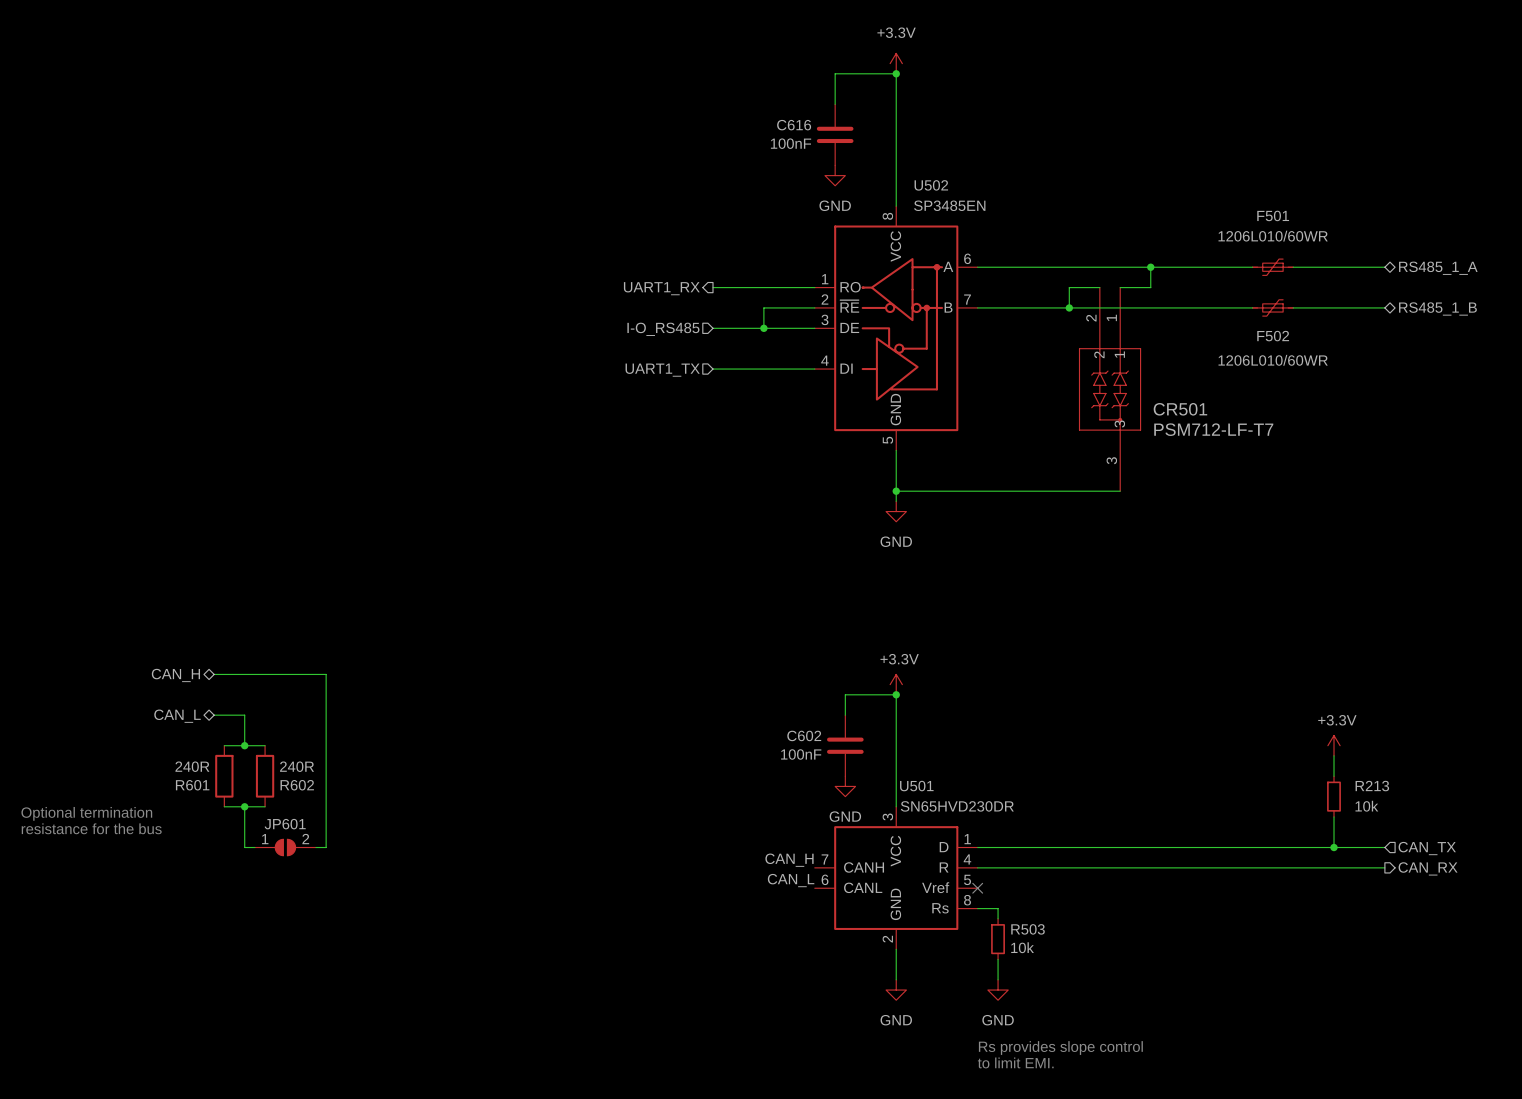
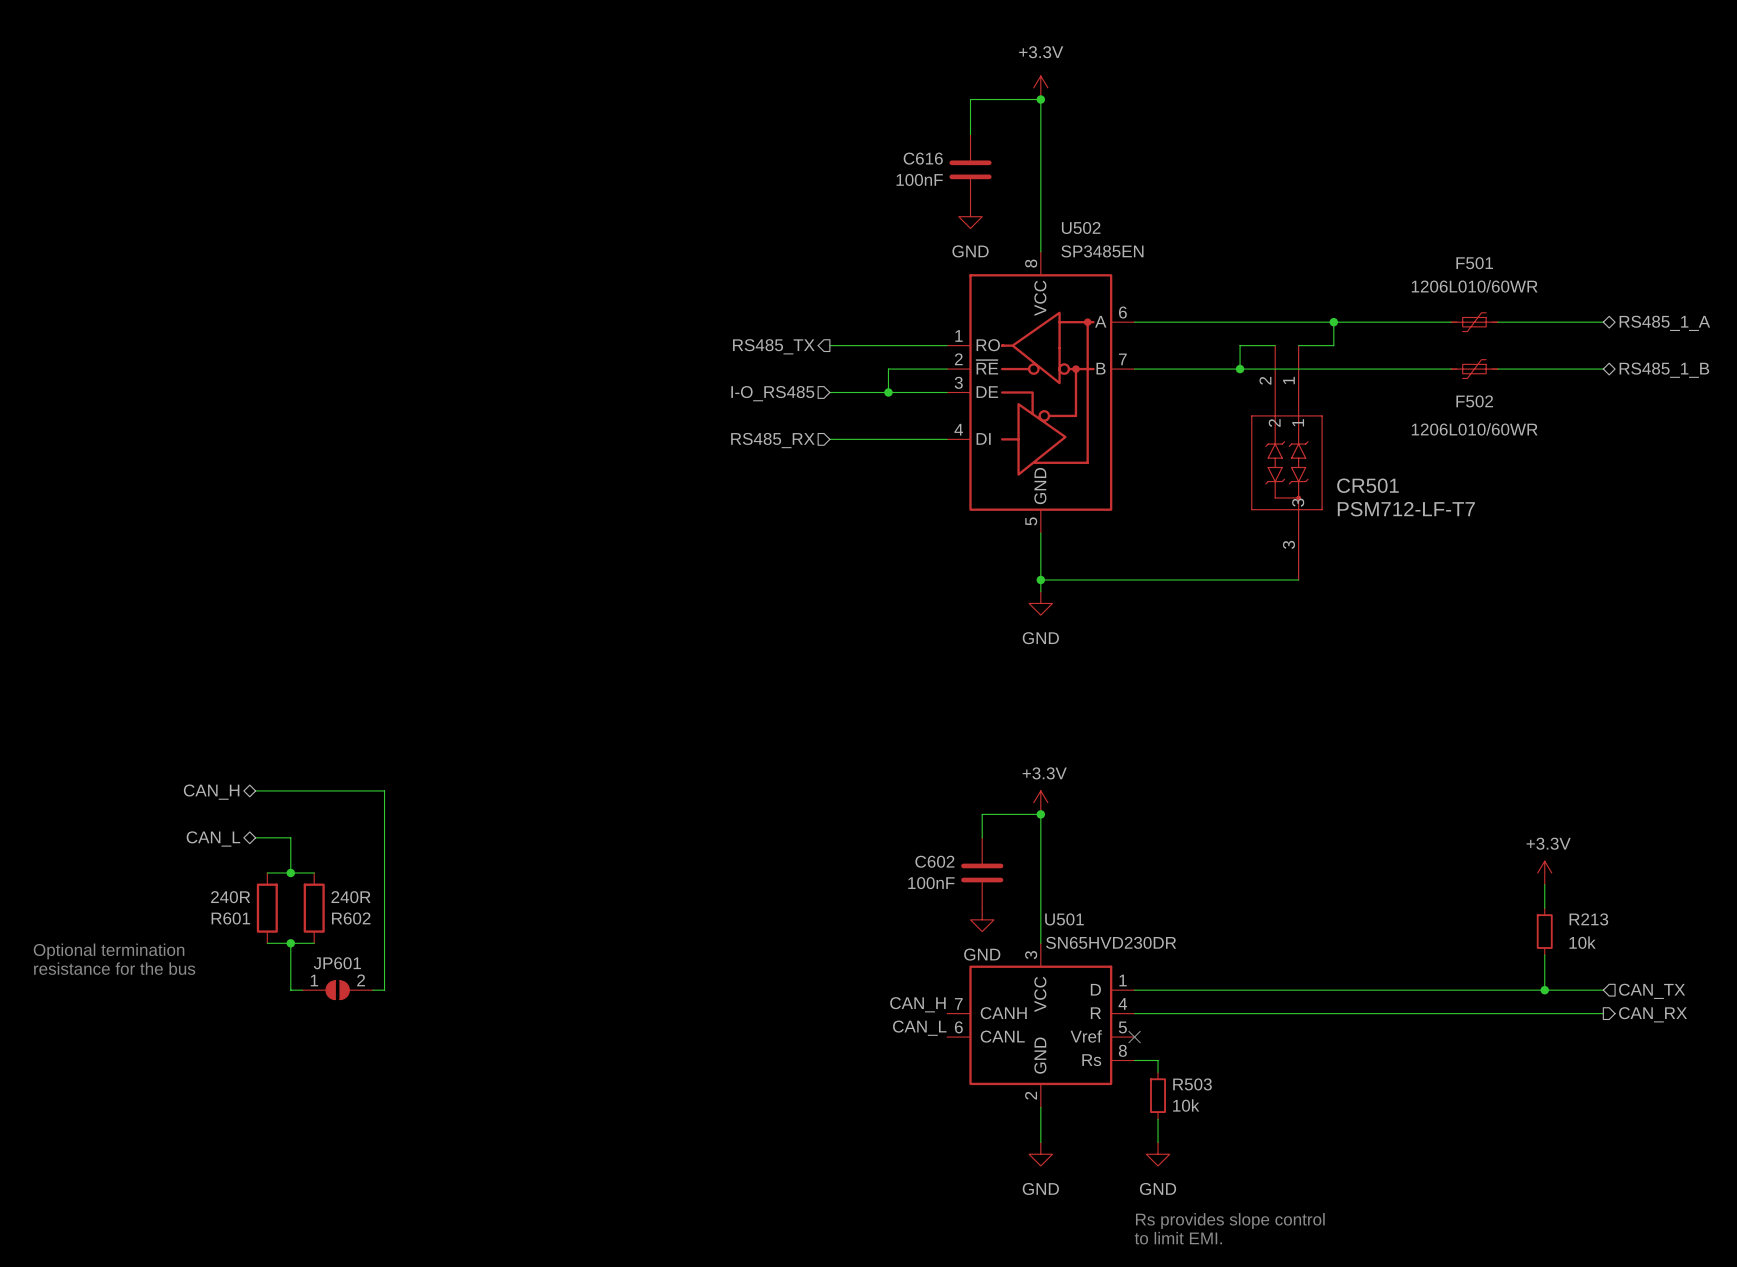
hierarchical label: UART1_RX (661, 288) -> RS485_TX (773, 346)
hierarchical label: UART1_TX (662, 370) -> RS485_RX (772, 440)

